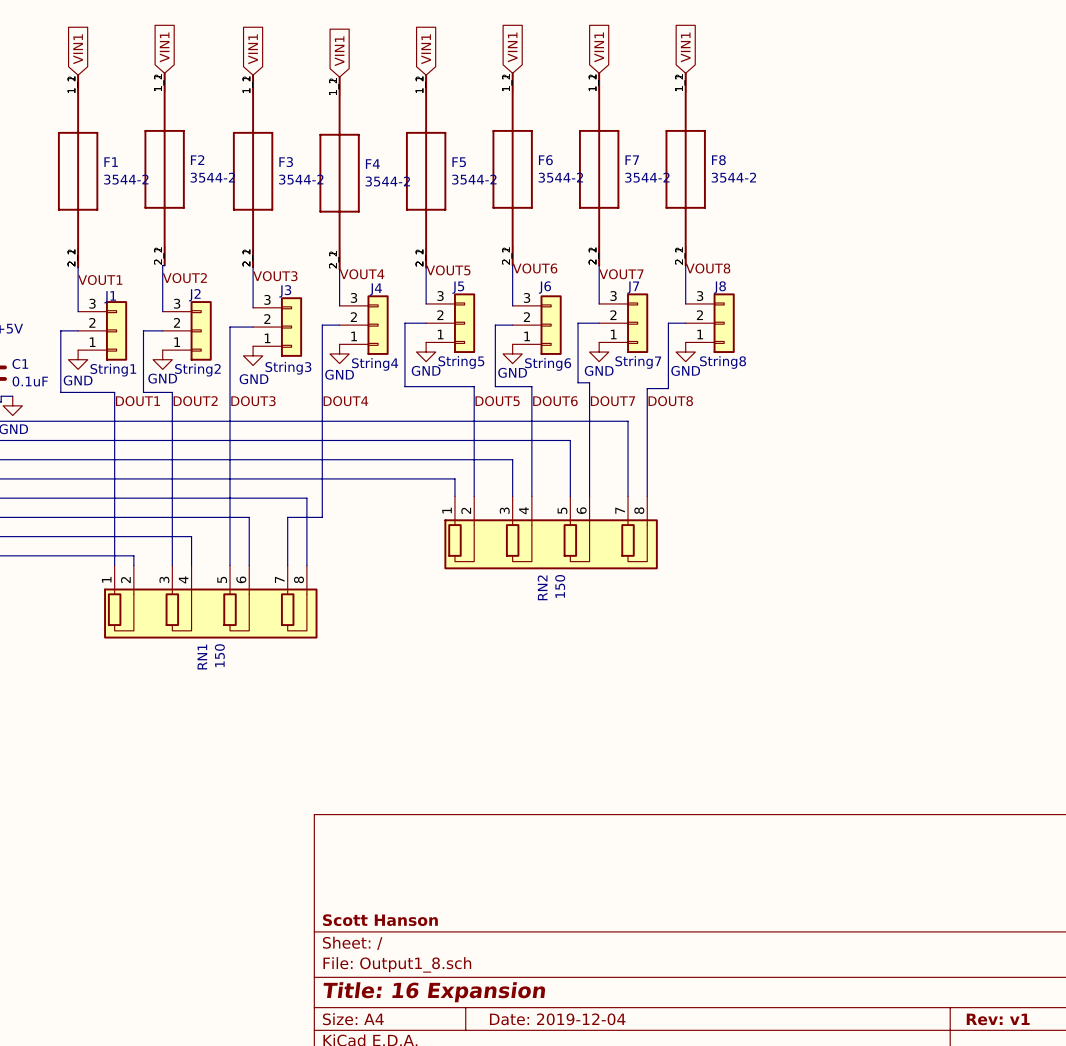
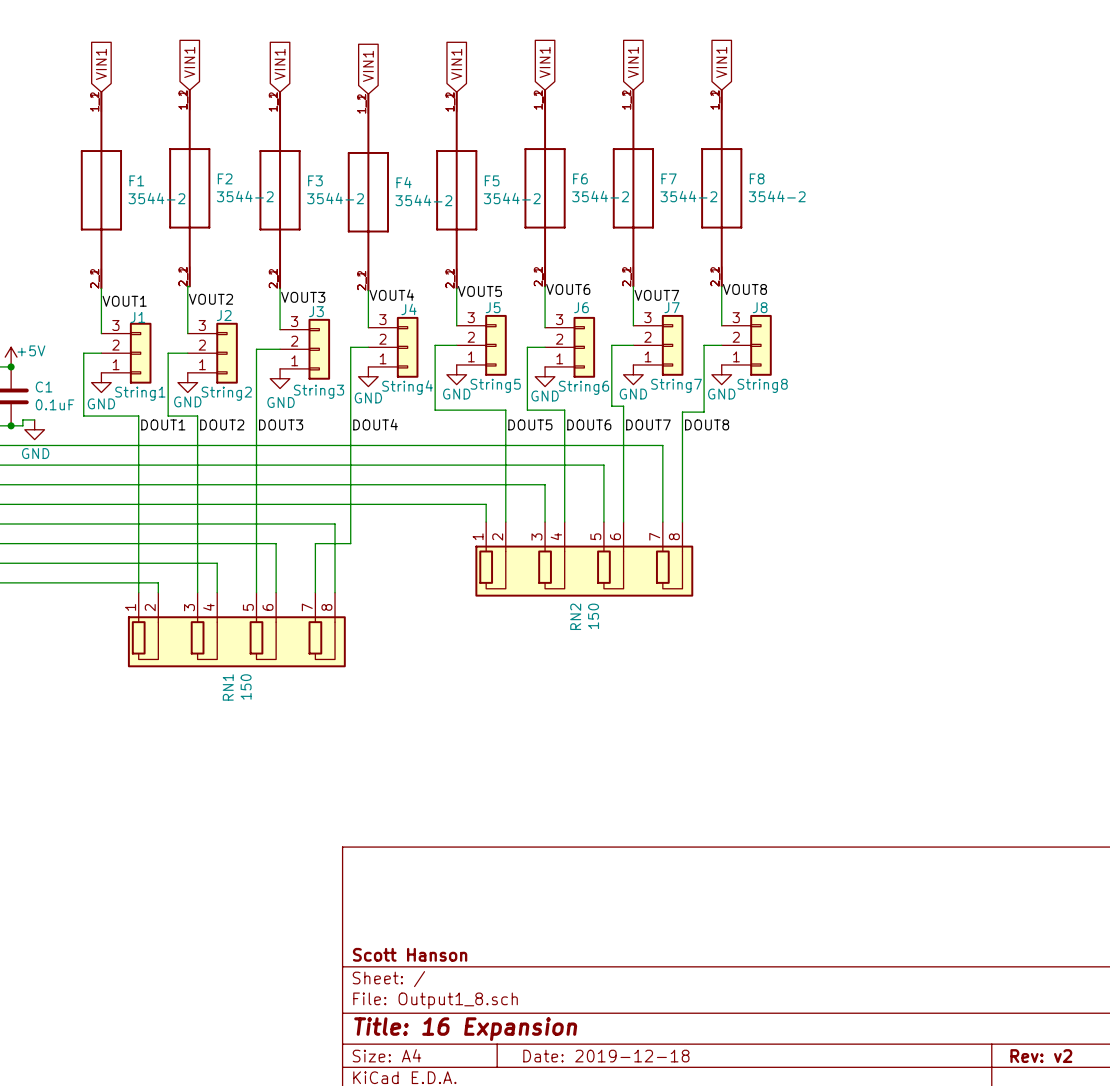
title block: Date: 2019-12-04 (557, 1019) -> Date: 2019-12-18 (606, 1056)
title block: Rev: v1 (998, 1019) -> Rev: v2 (1041, 1056)

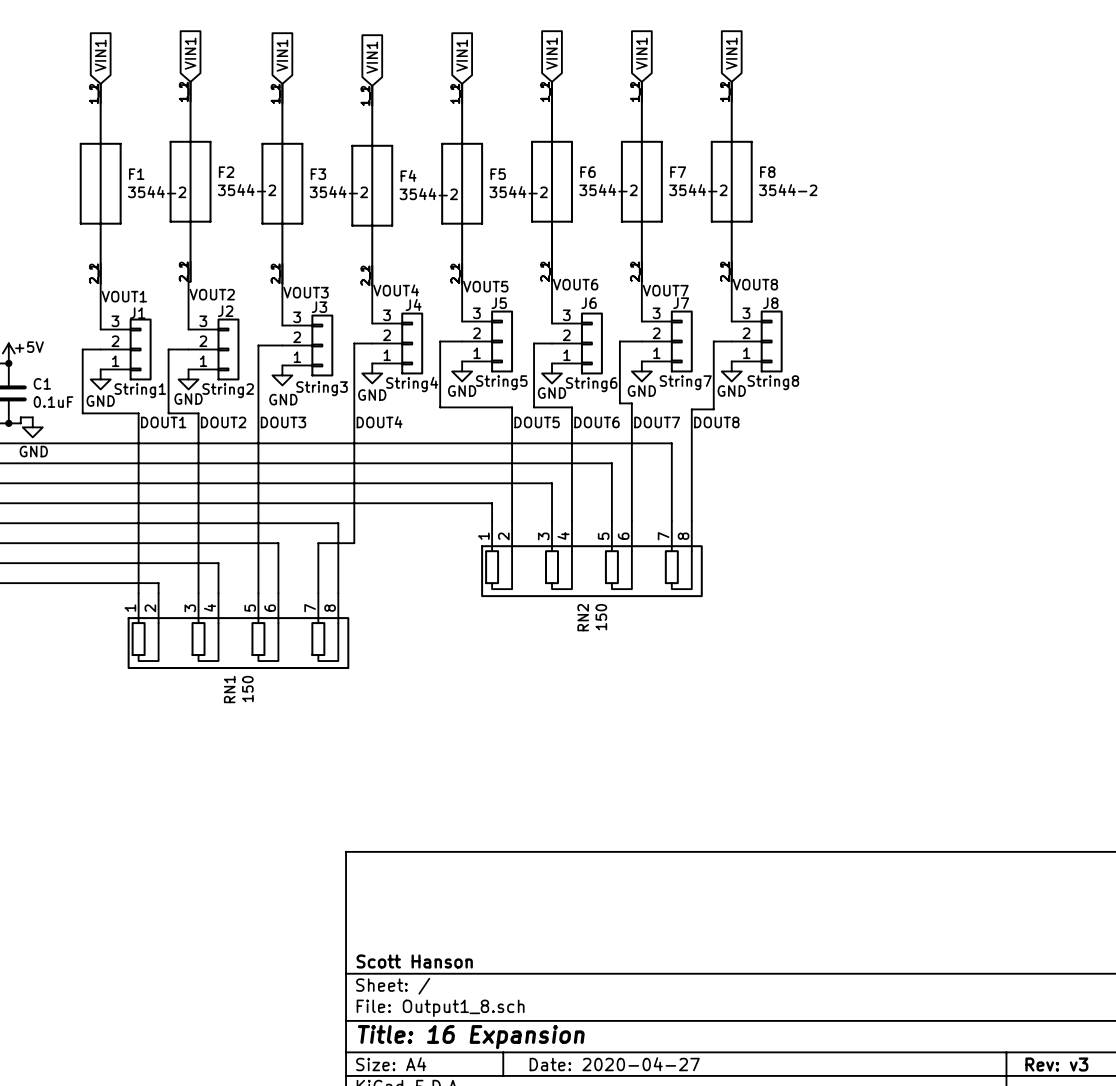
title block: Date: 2019-12-18 (606, 1056) -> Date: 2020-04-27 (614, 1064)
title block: Rev: v2 (1041, 1056) -> Rev: v3 (1056, 1064)

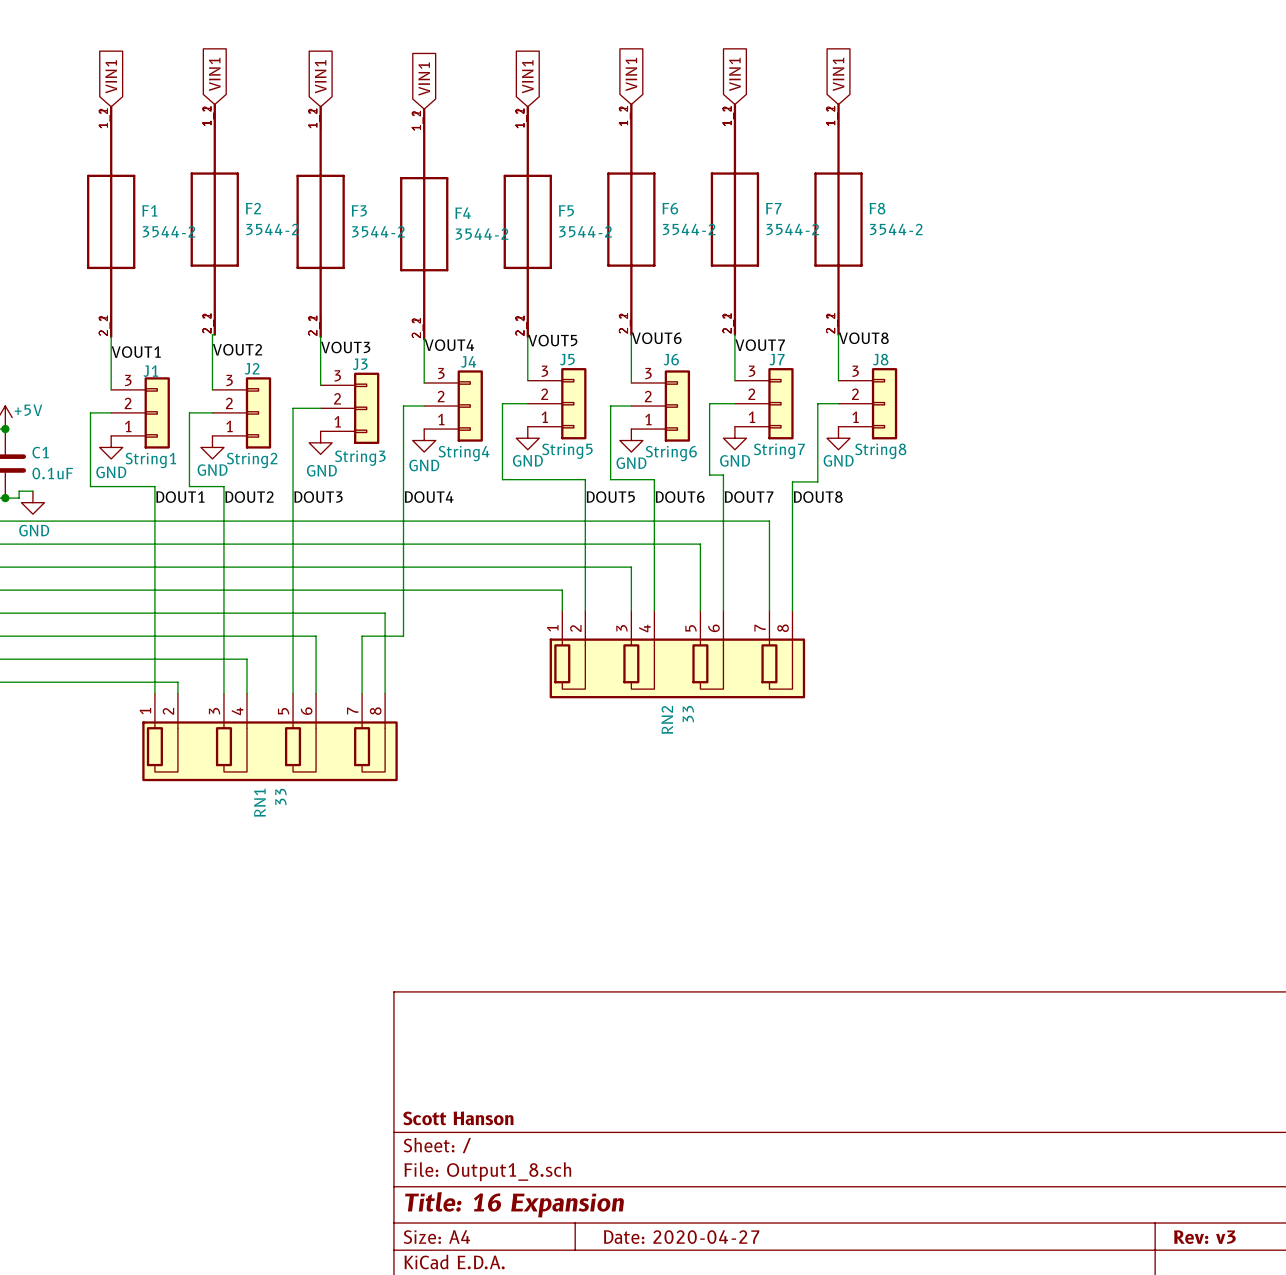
RN2 value: 150 (601, 617) -> 33 (688, 714)
RN1 value: 150 (247, 689) -> 33 (280, 796)

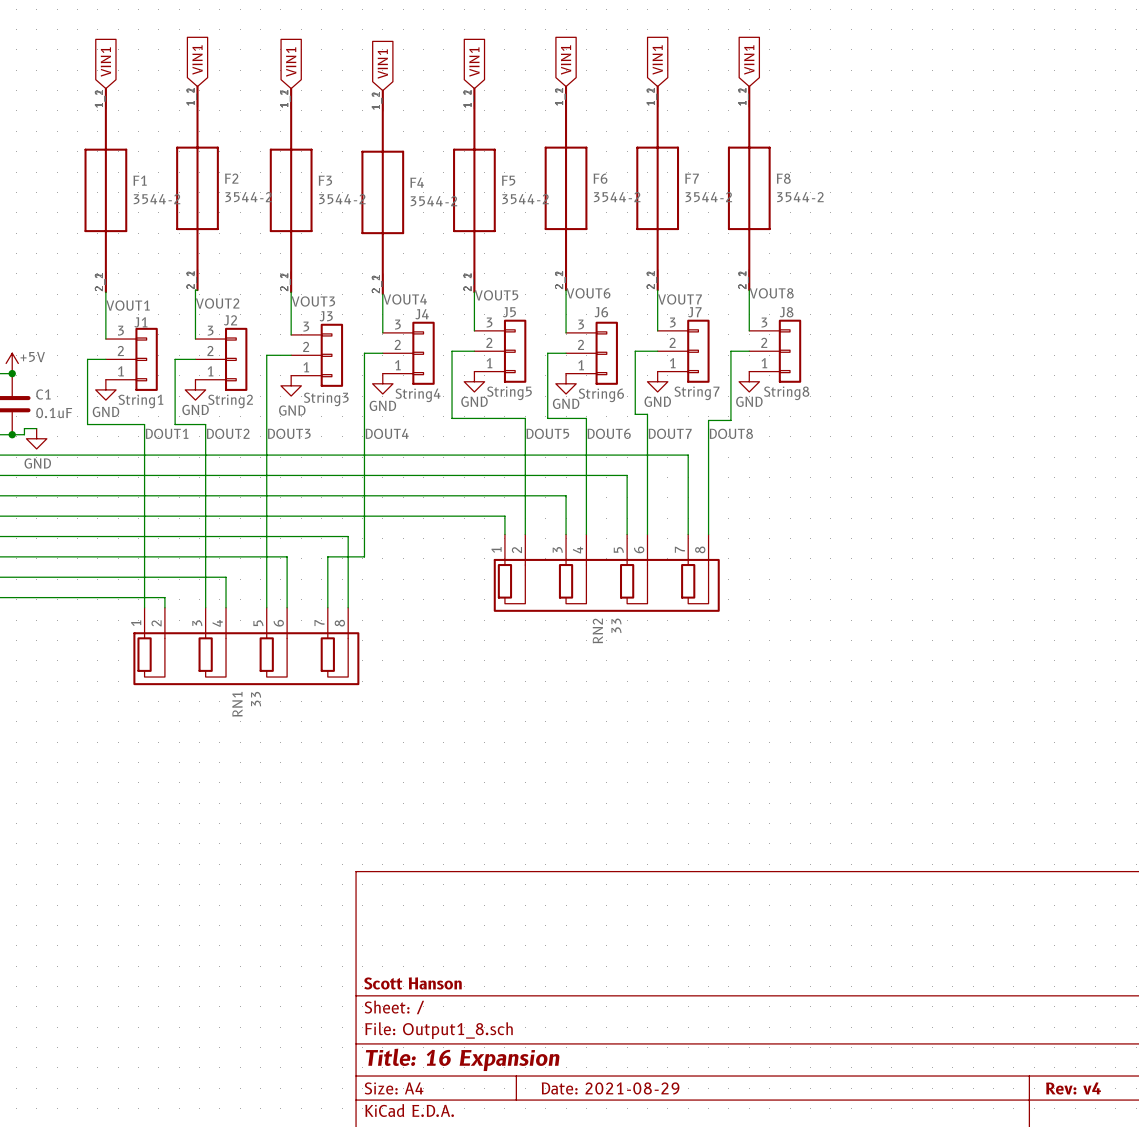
title block: Date: 2020-04-27 (681, 1237) -> Date: 2021-08-29 (610, 1088)
title block: Rev: v3 (1204, 1237) -> Rev: v4 (1073, 1088)

